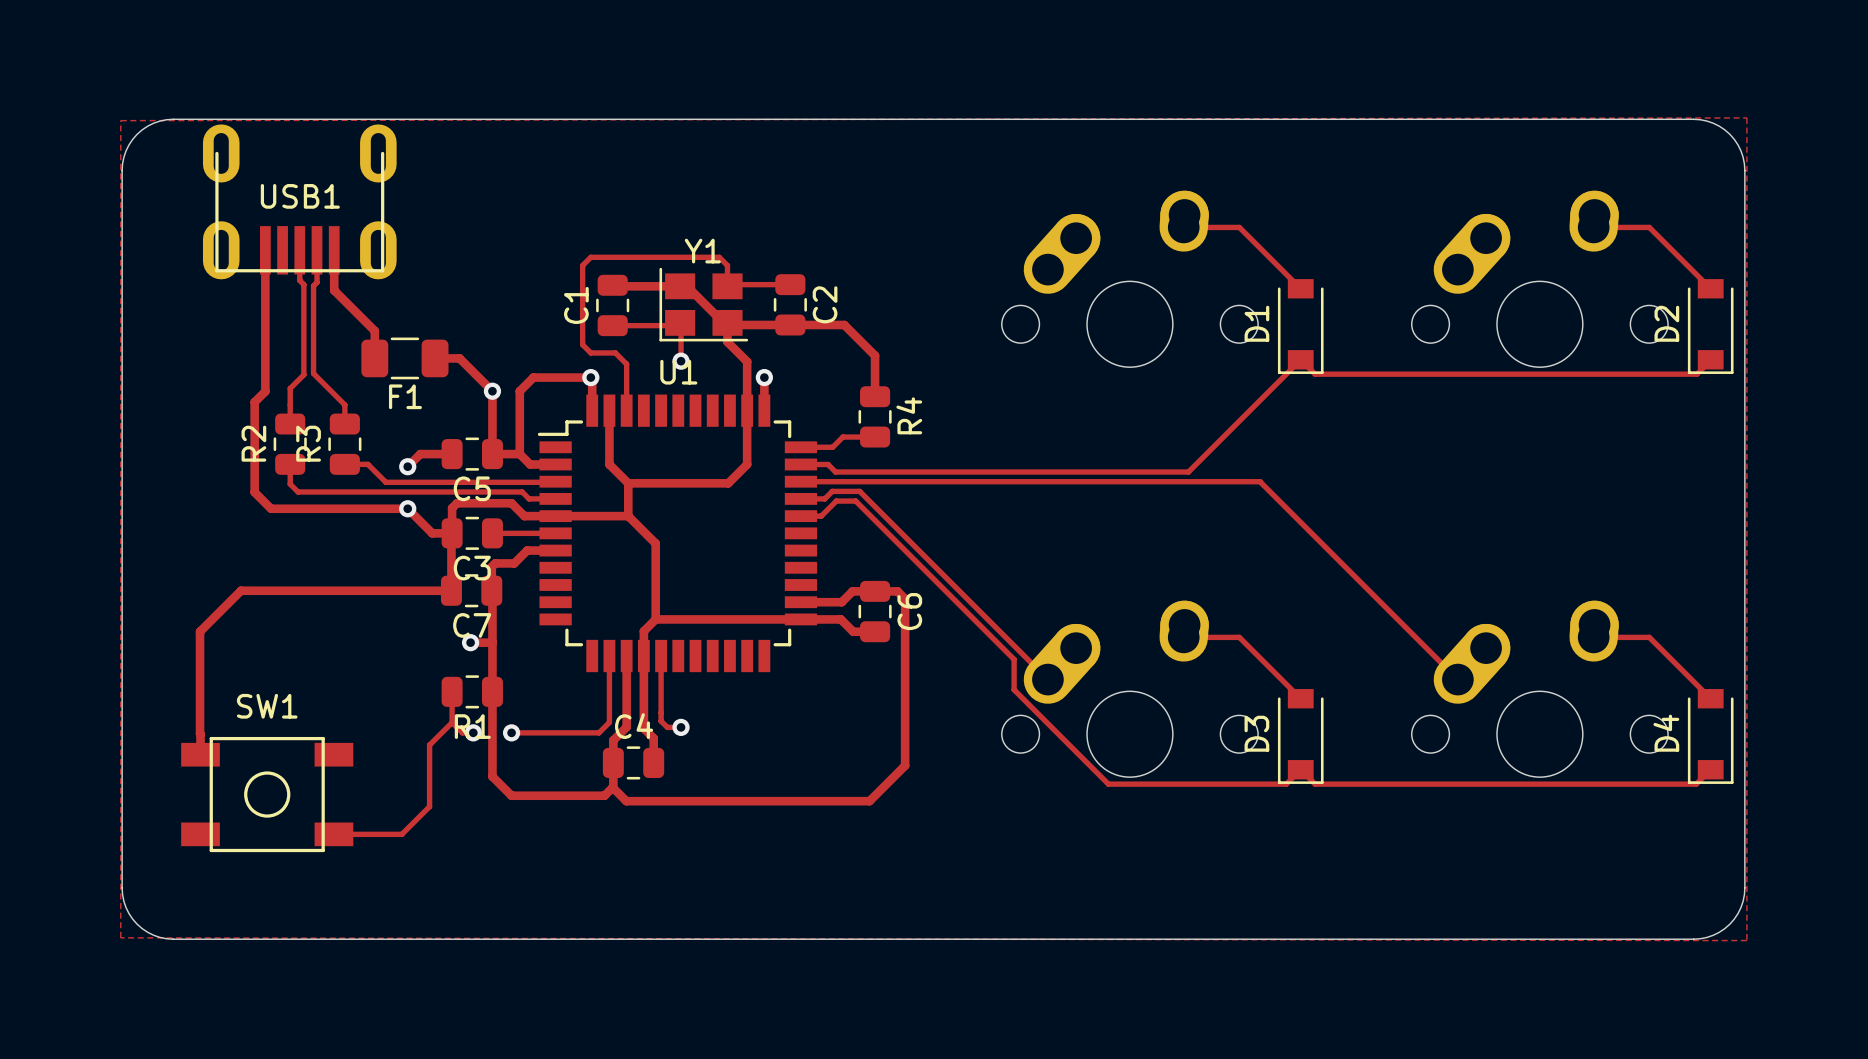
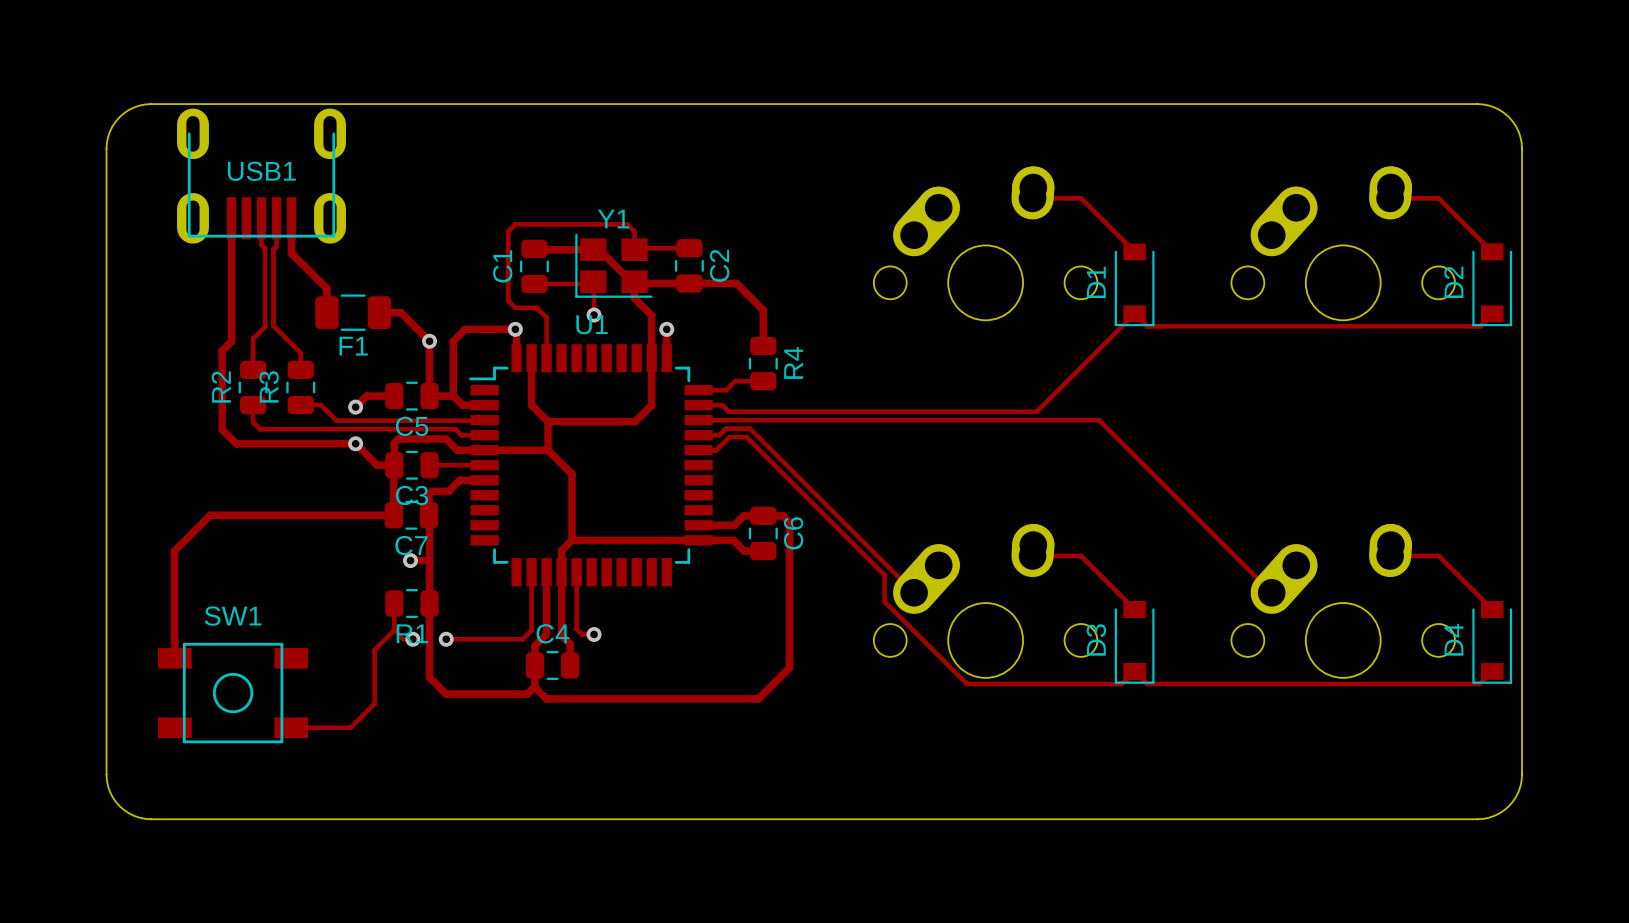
zone outline: (1746, 117) (120, 120) (120, 937) (1746, 940) (1746, 117) -> none

